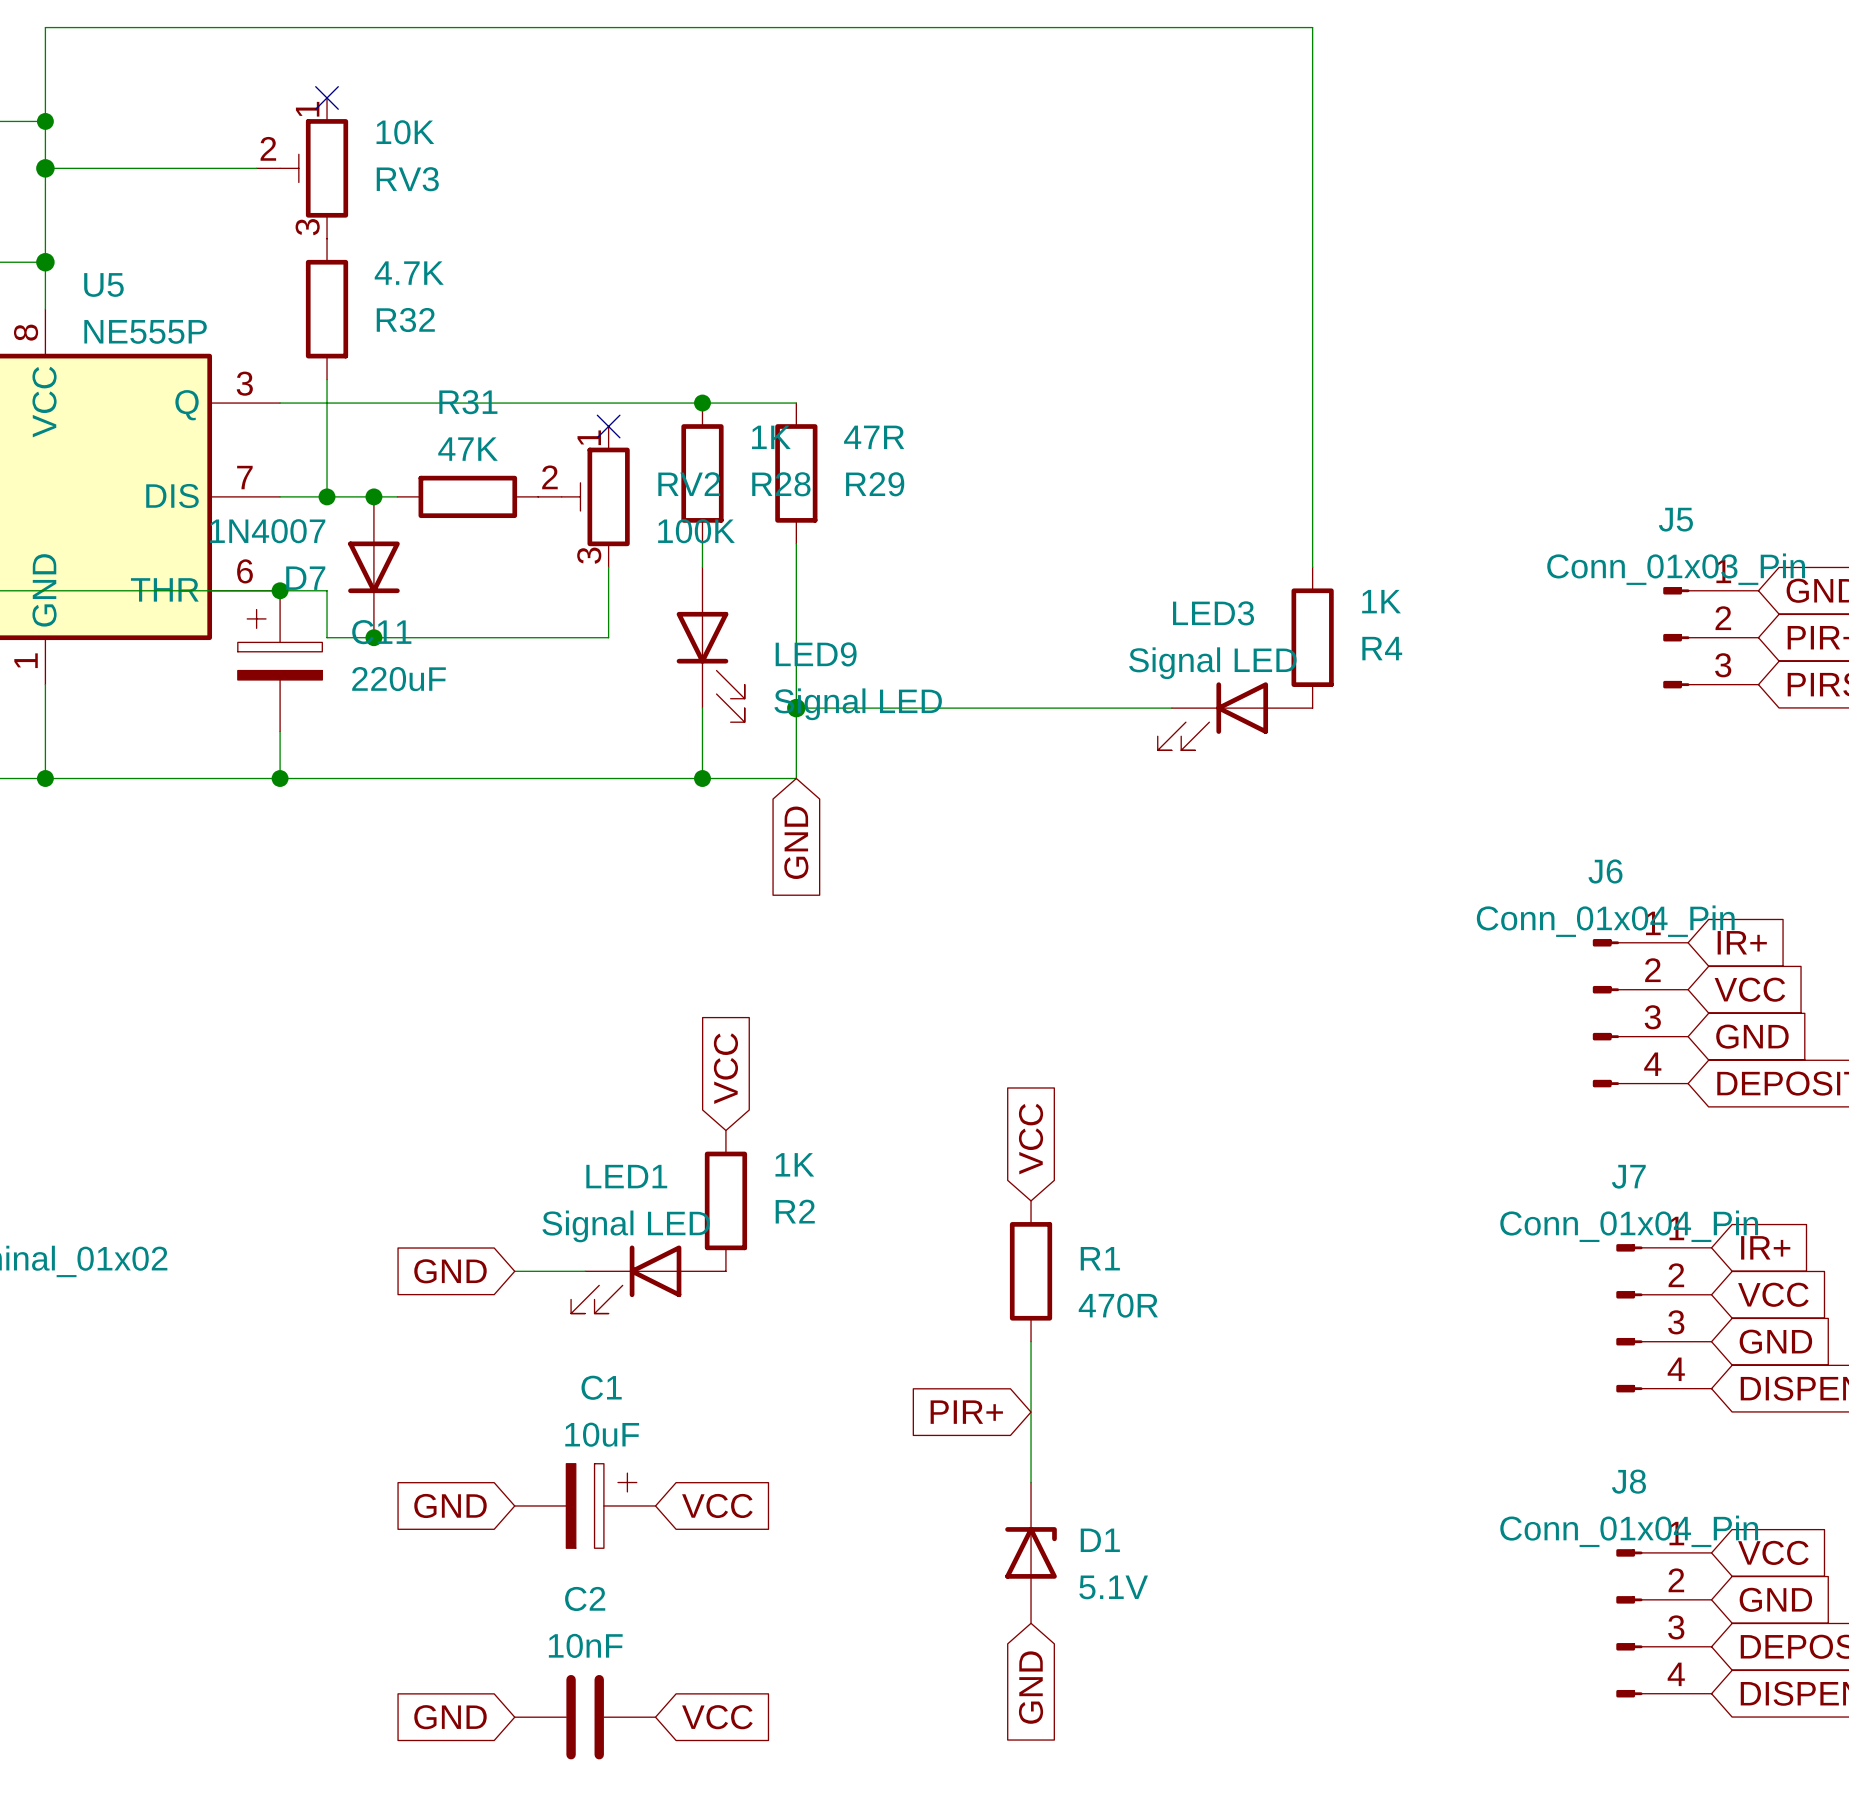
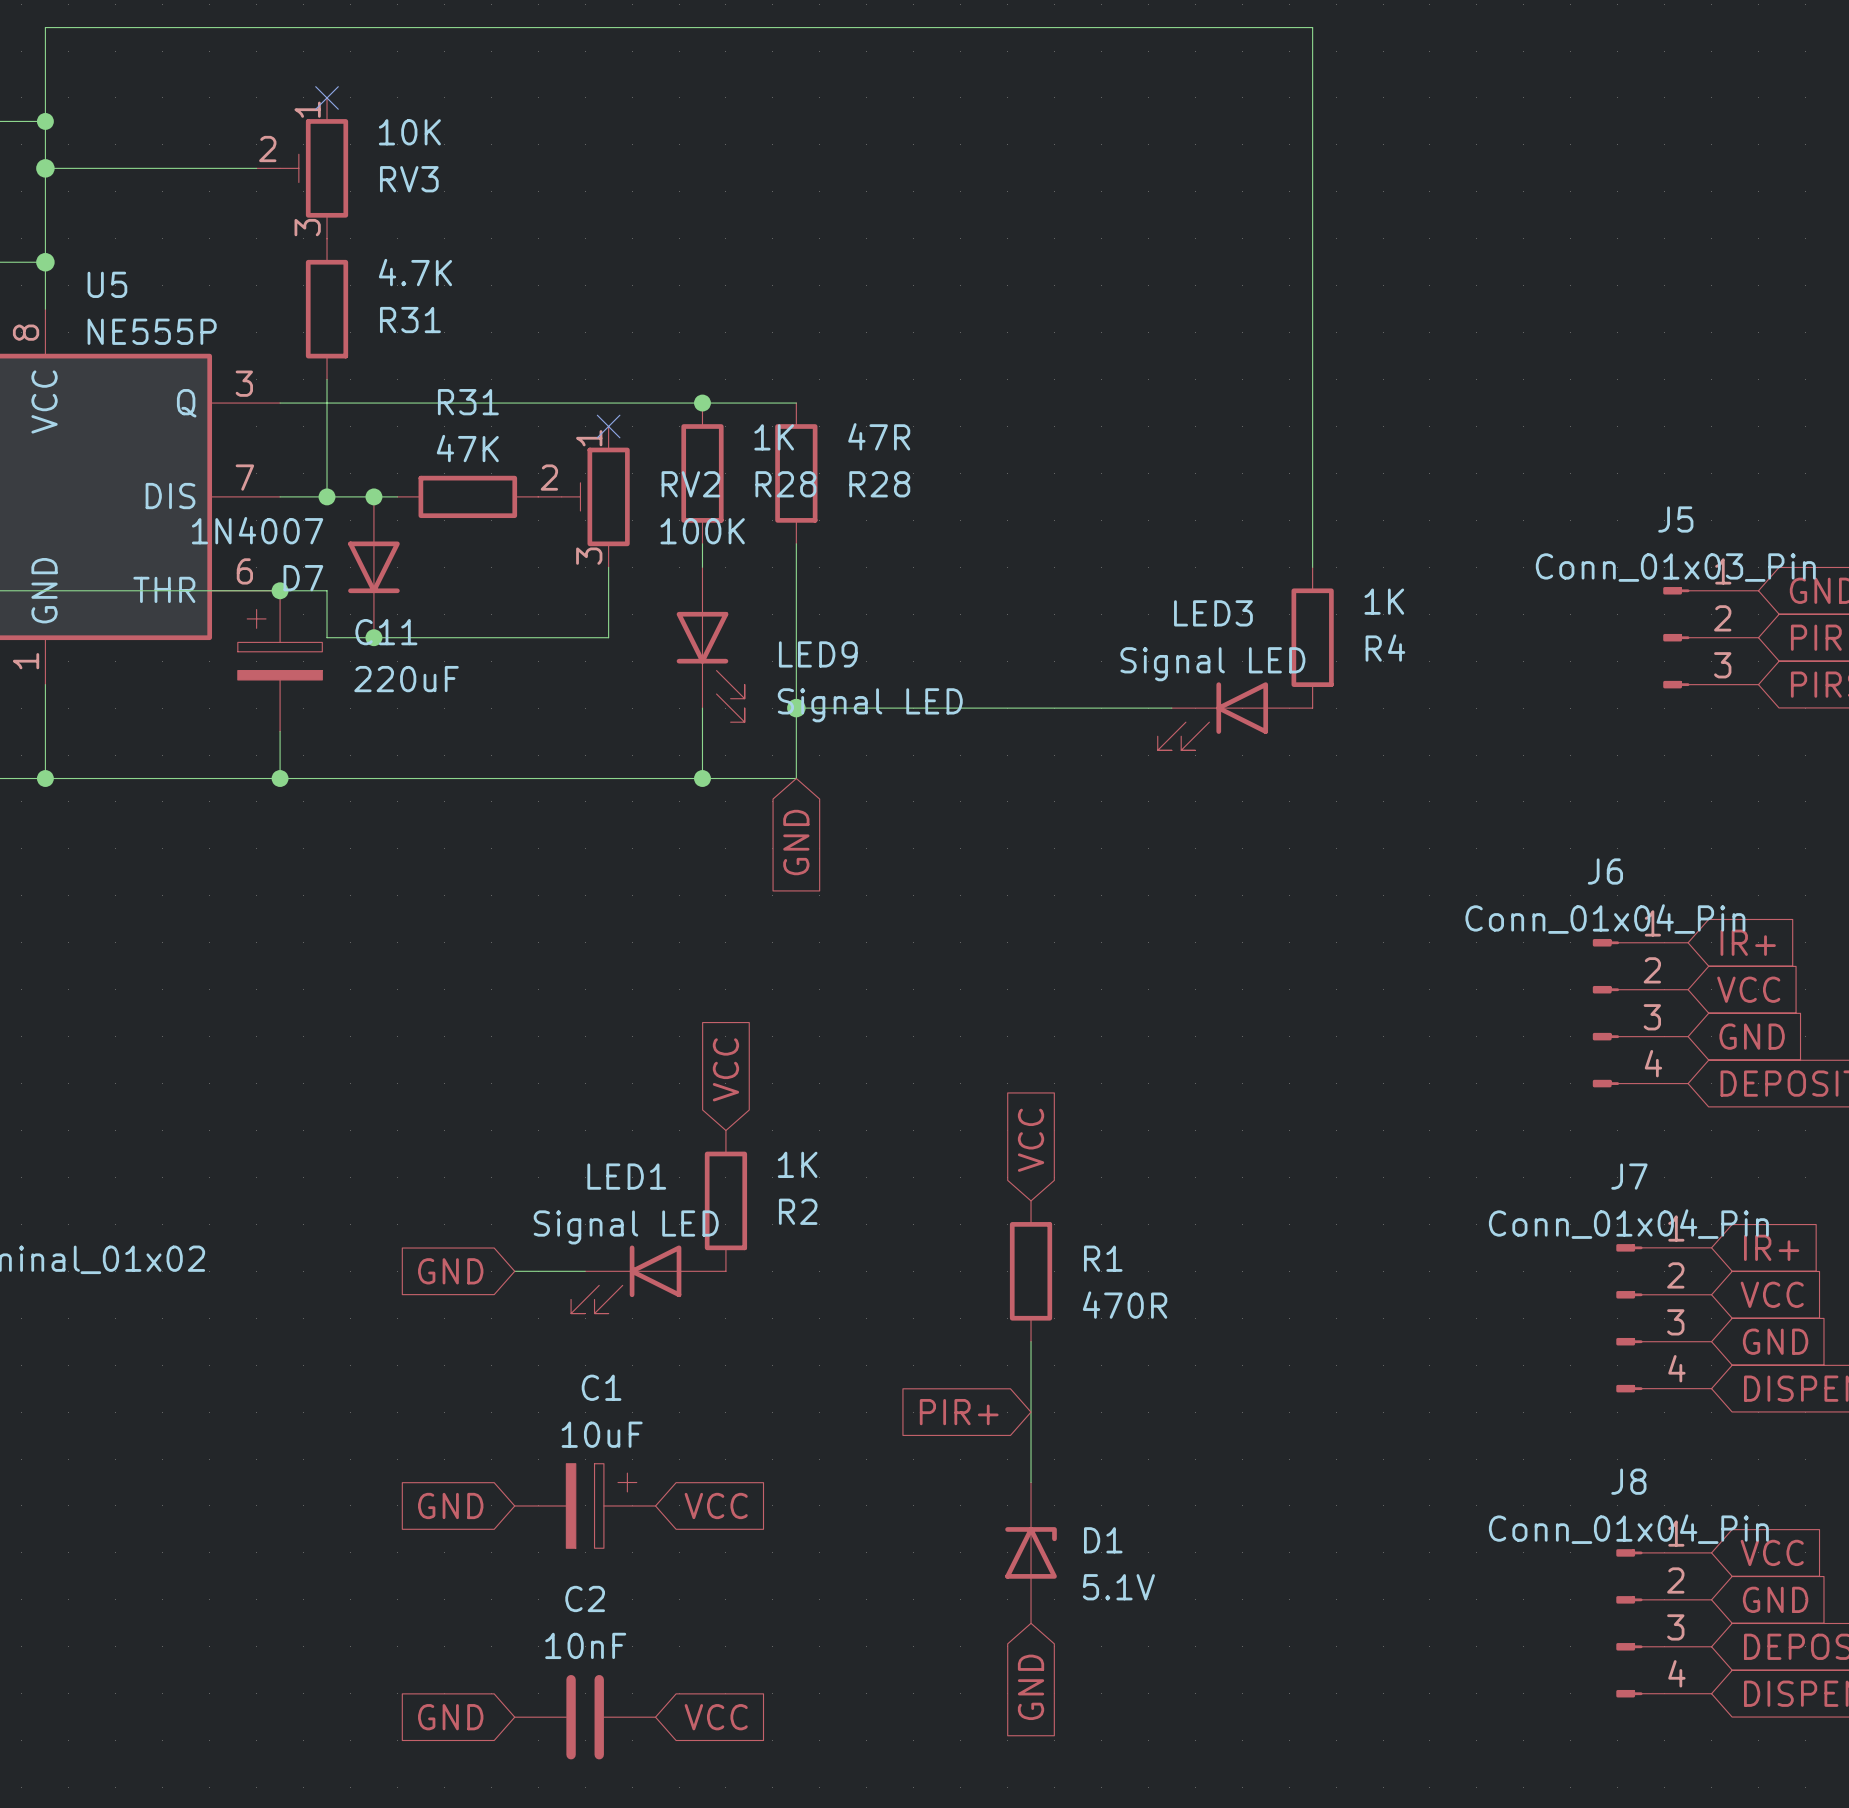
R32 name: R32 (405, 320) -> R31 (410, 320)
R29 name: R29 (875, 484) -> R28 (879, 484)

